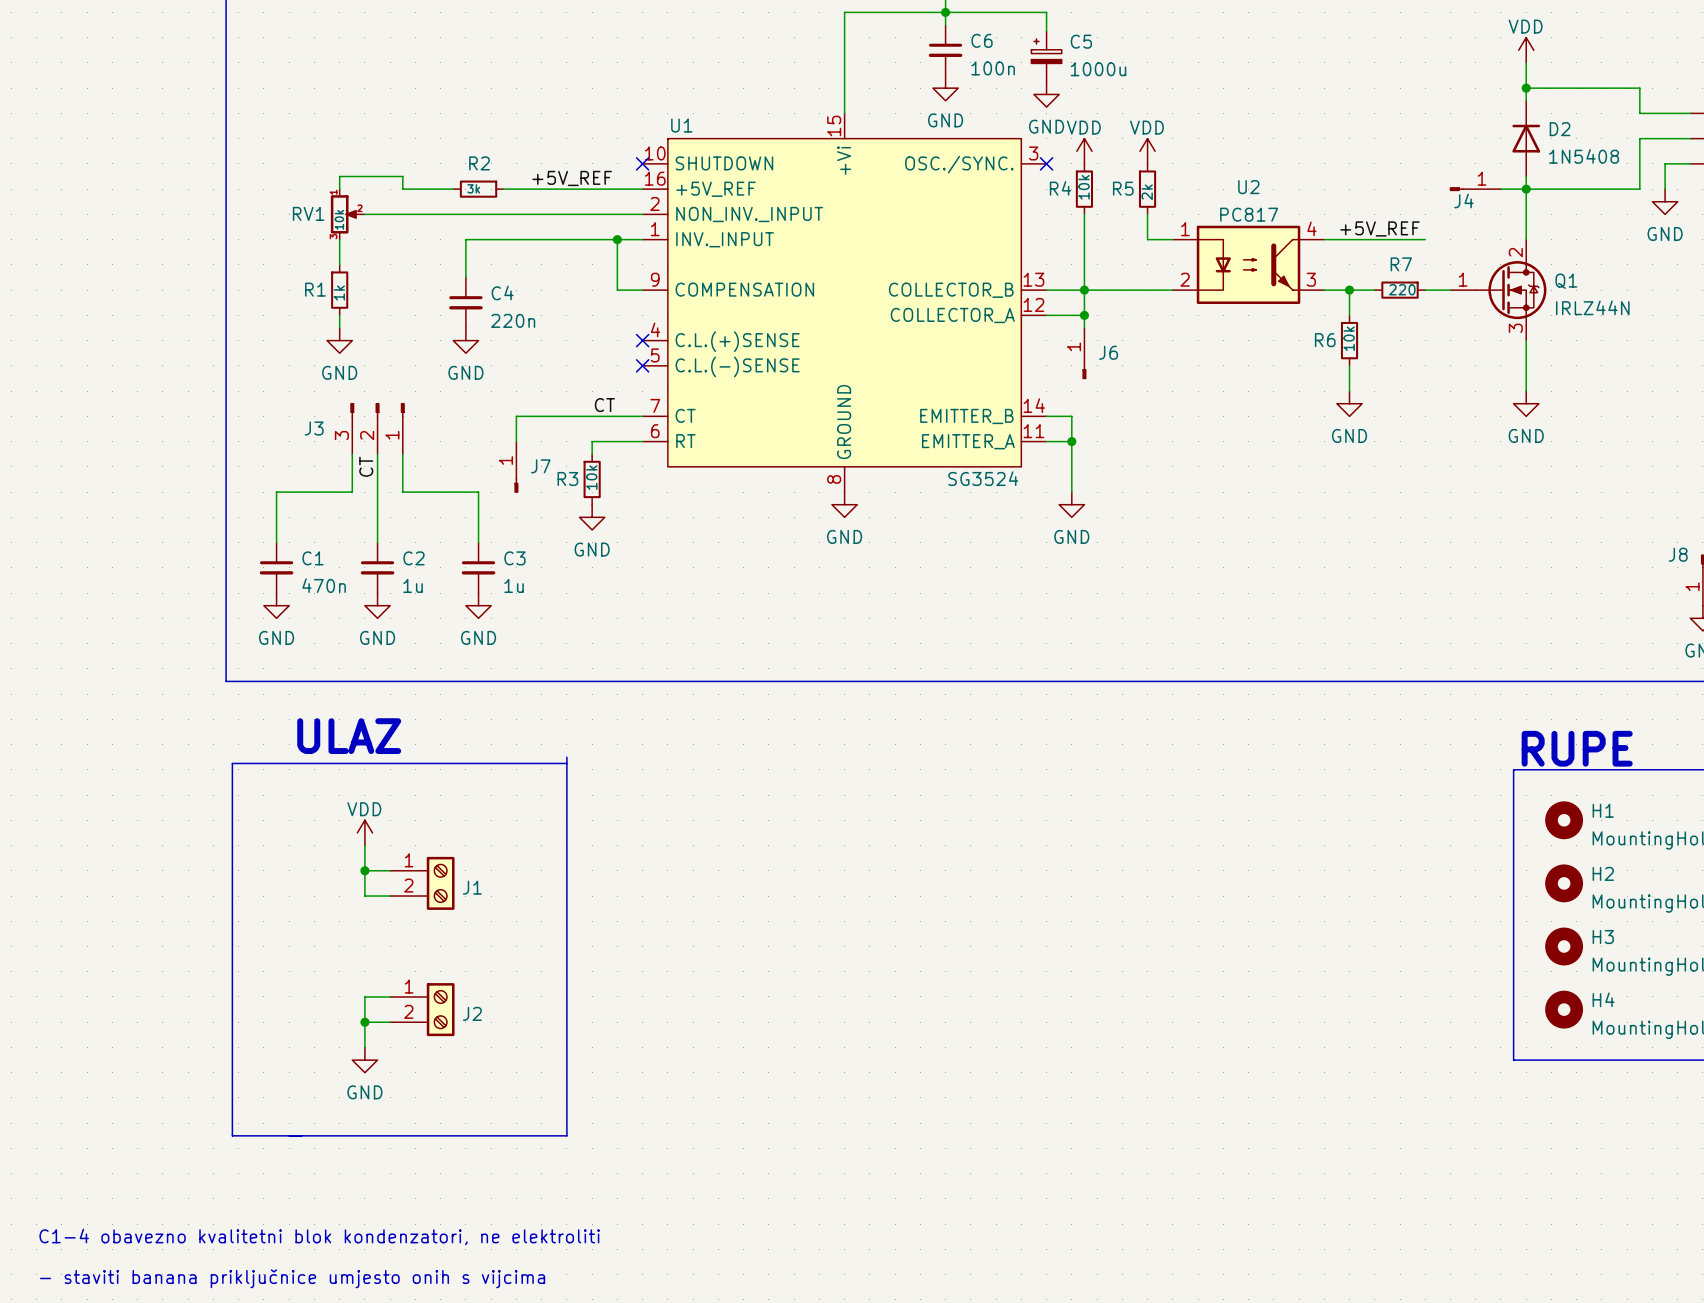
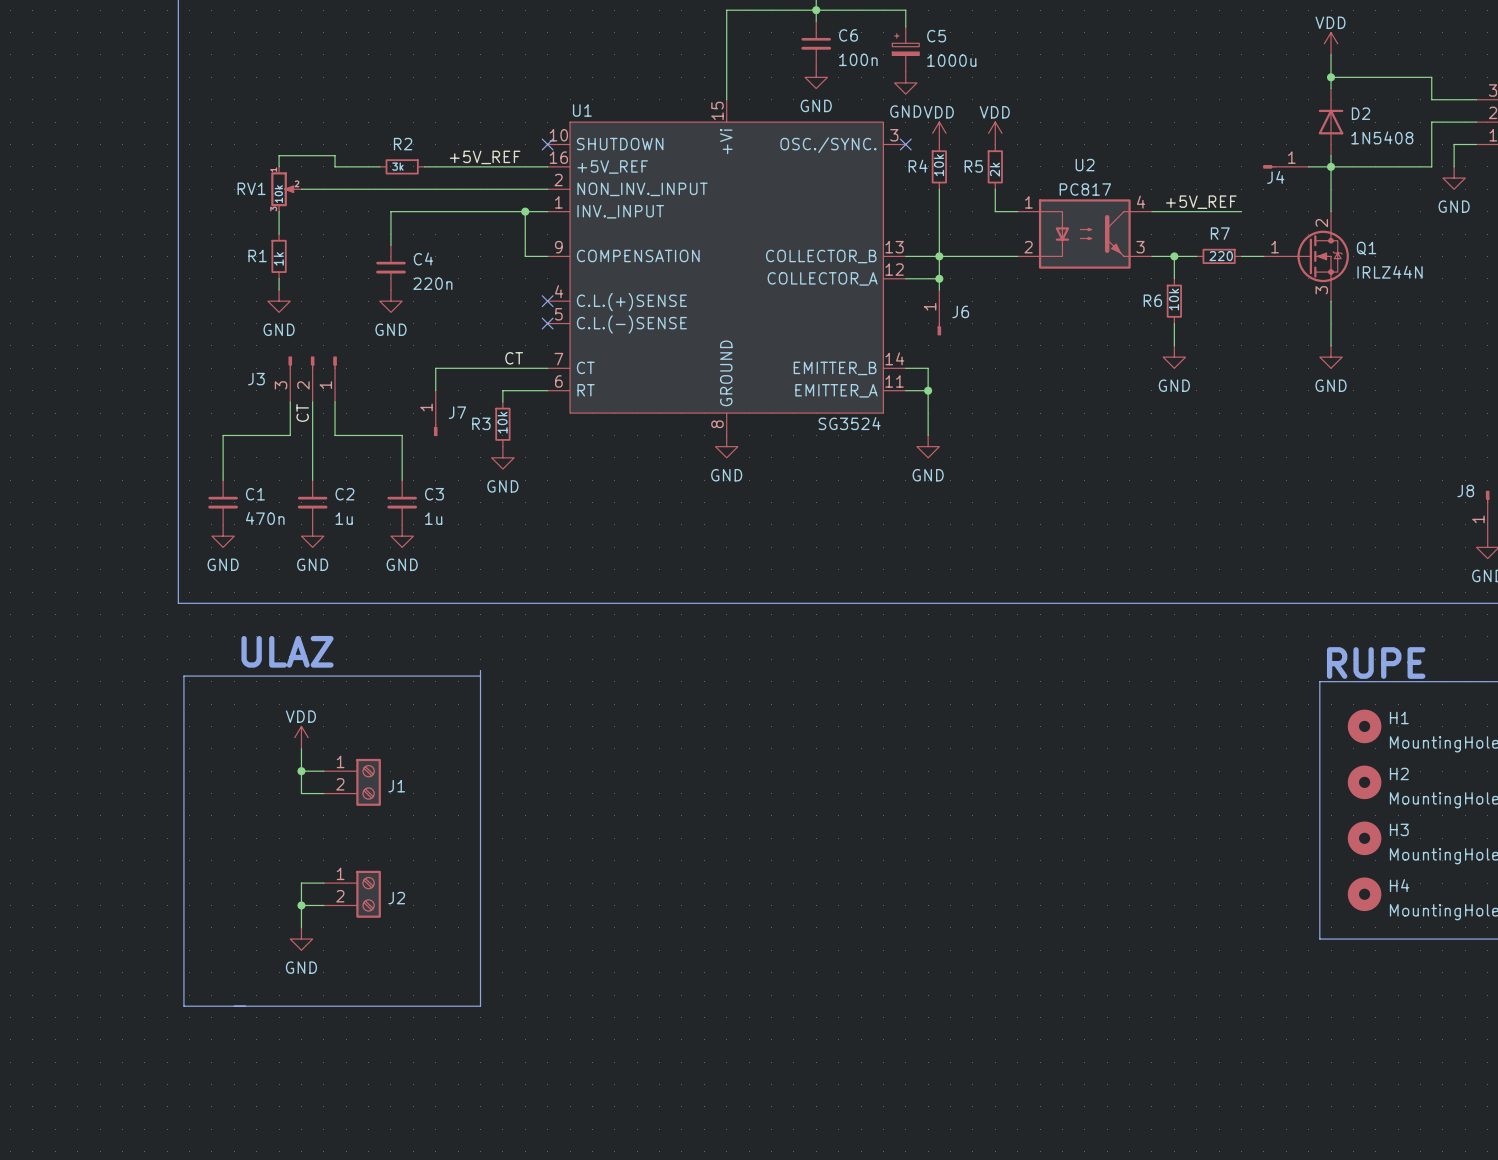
text: C1-4 obavezno kvalitetni blok kondenzatori, ne elektroliti (319, 1236) -> none
text: - staviti banana priključnice umjesto onih s vijcima (292, 1278) -> none

